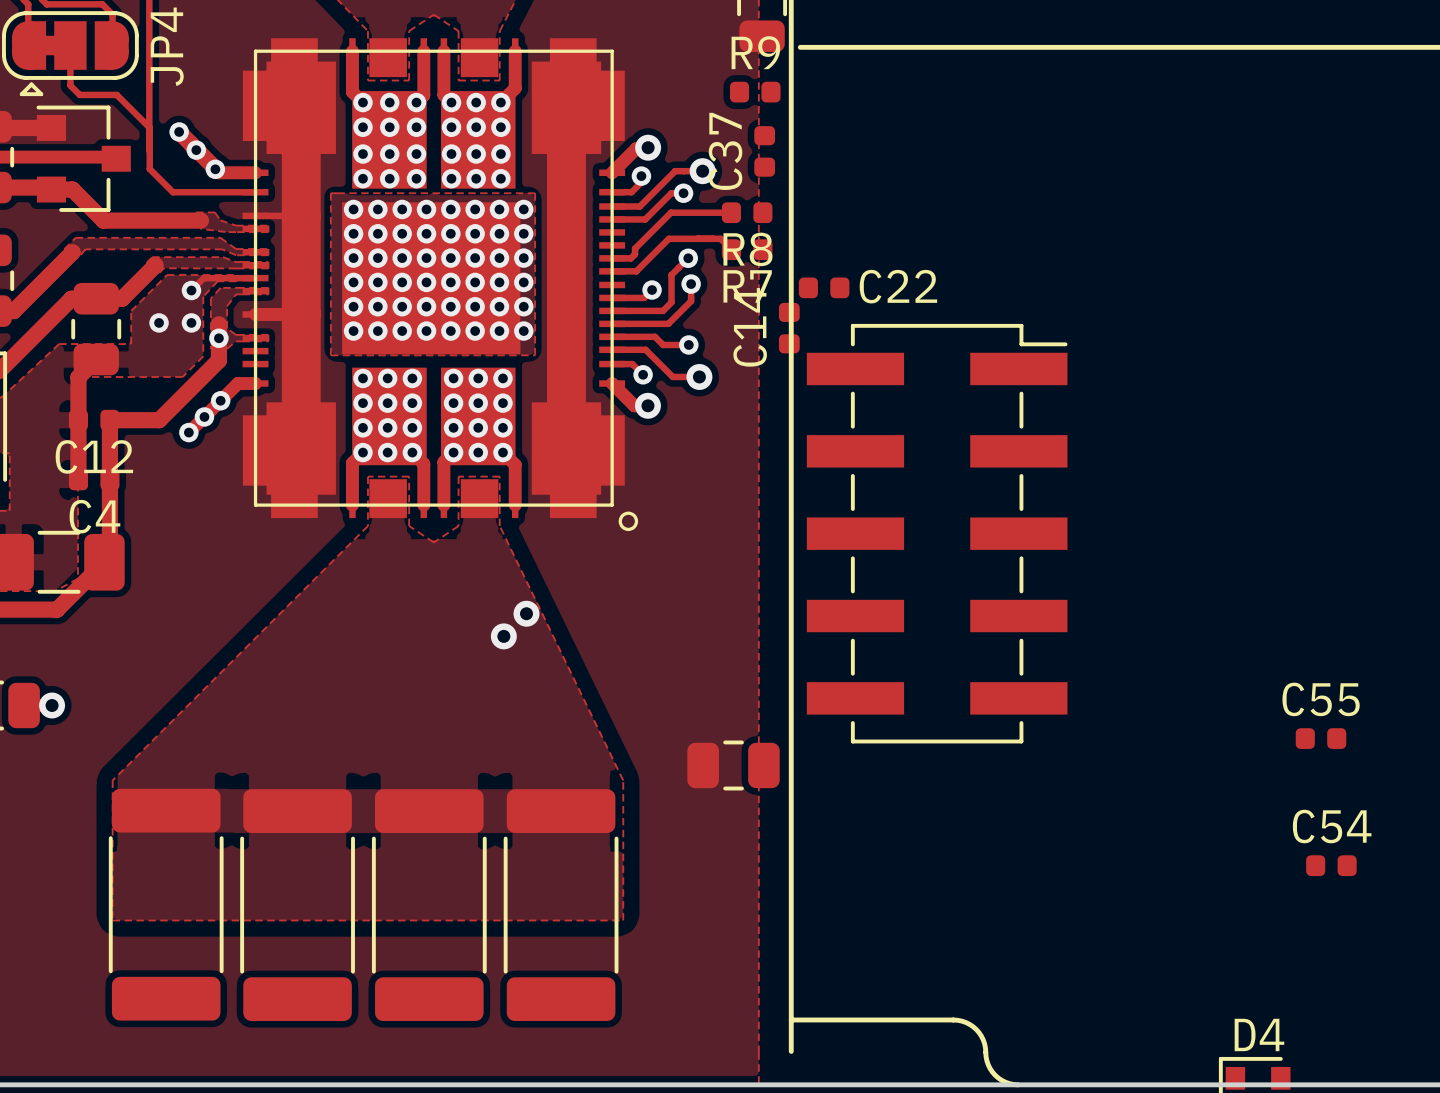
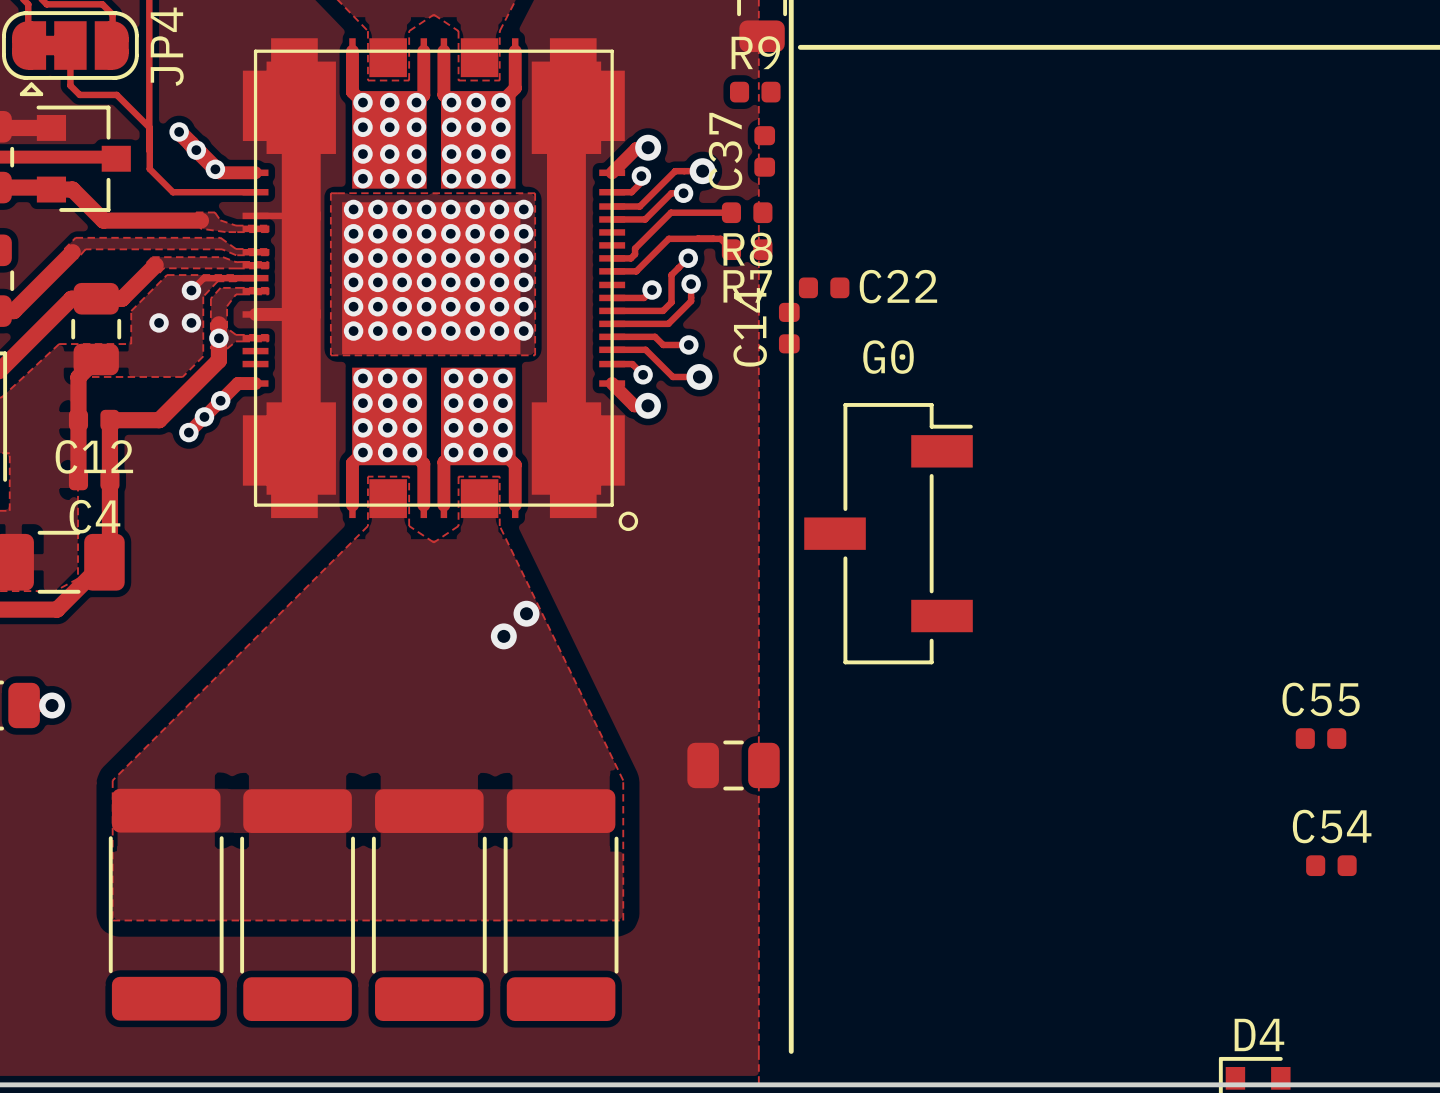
G0: none -> (888, 533)
part: (937, 533) -> none
line: (791, 1019) (961, 1021) (973, 1026) (981, 1036) (988, 1064) (995, 1075) (1005, 1082) (1018, 1084) -> none

